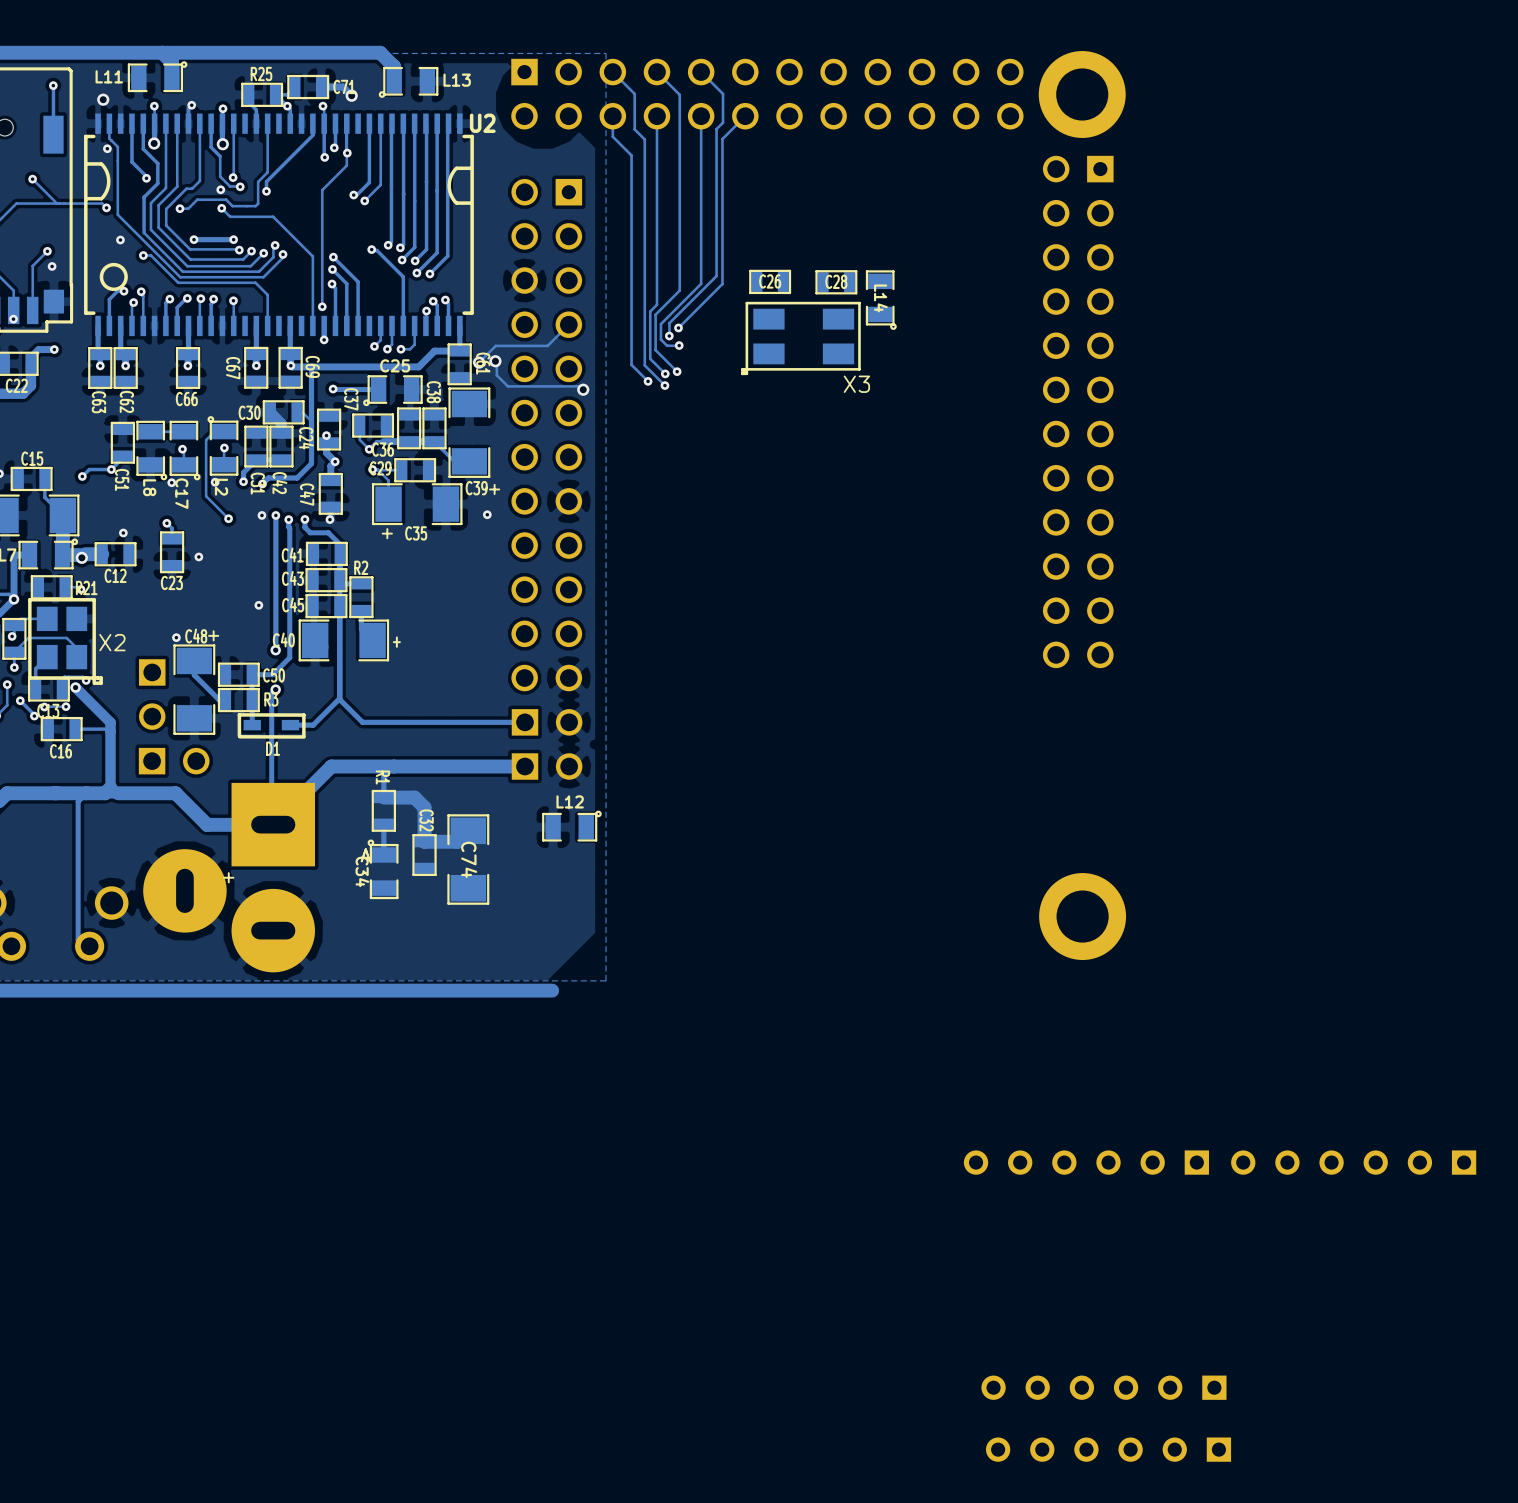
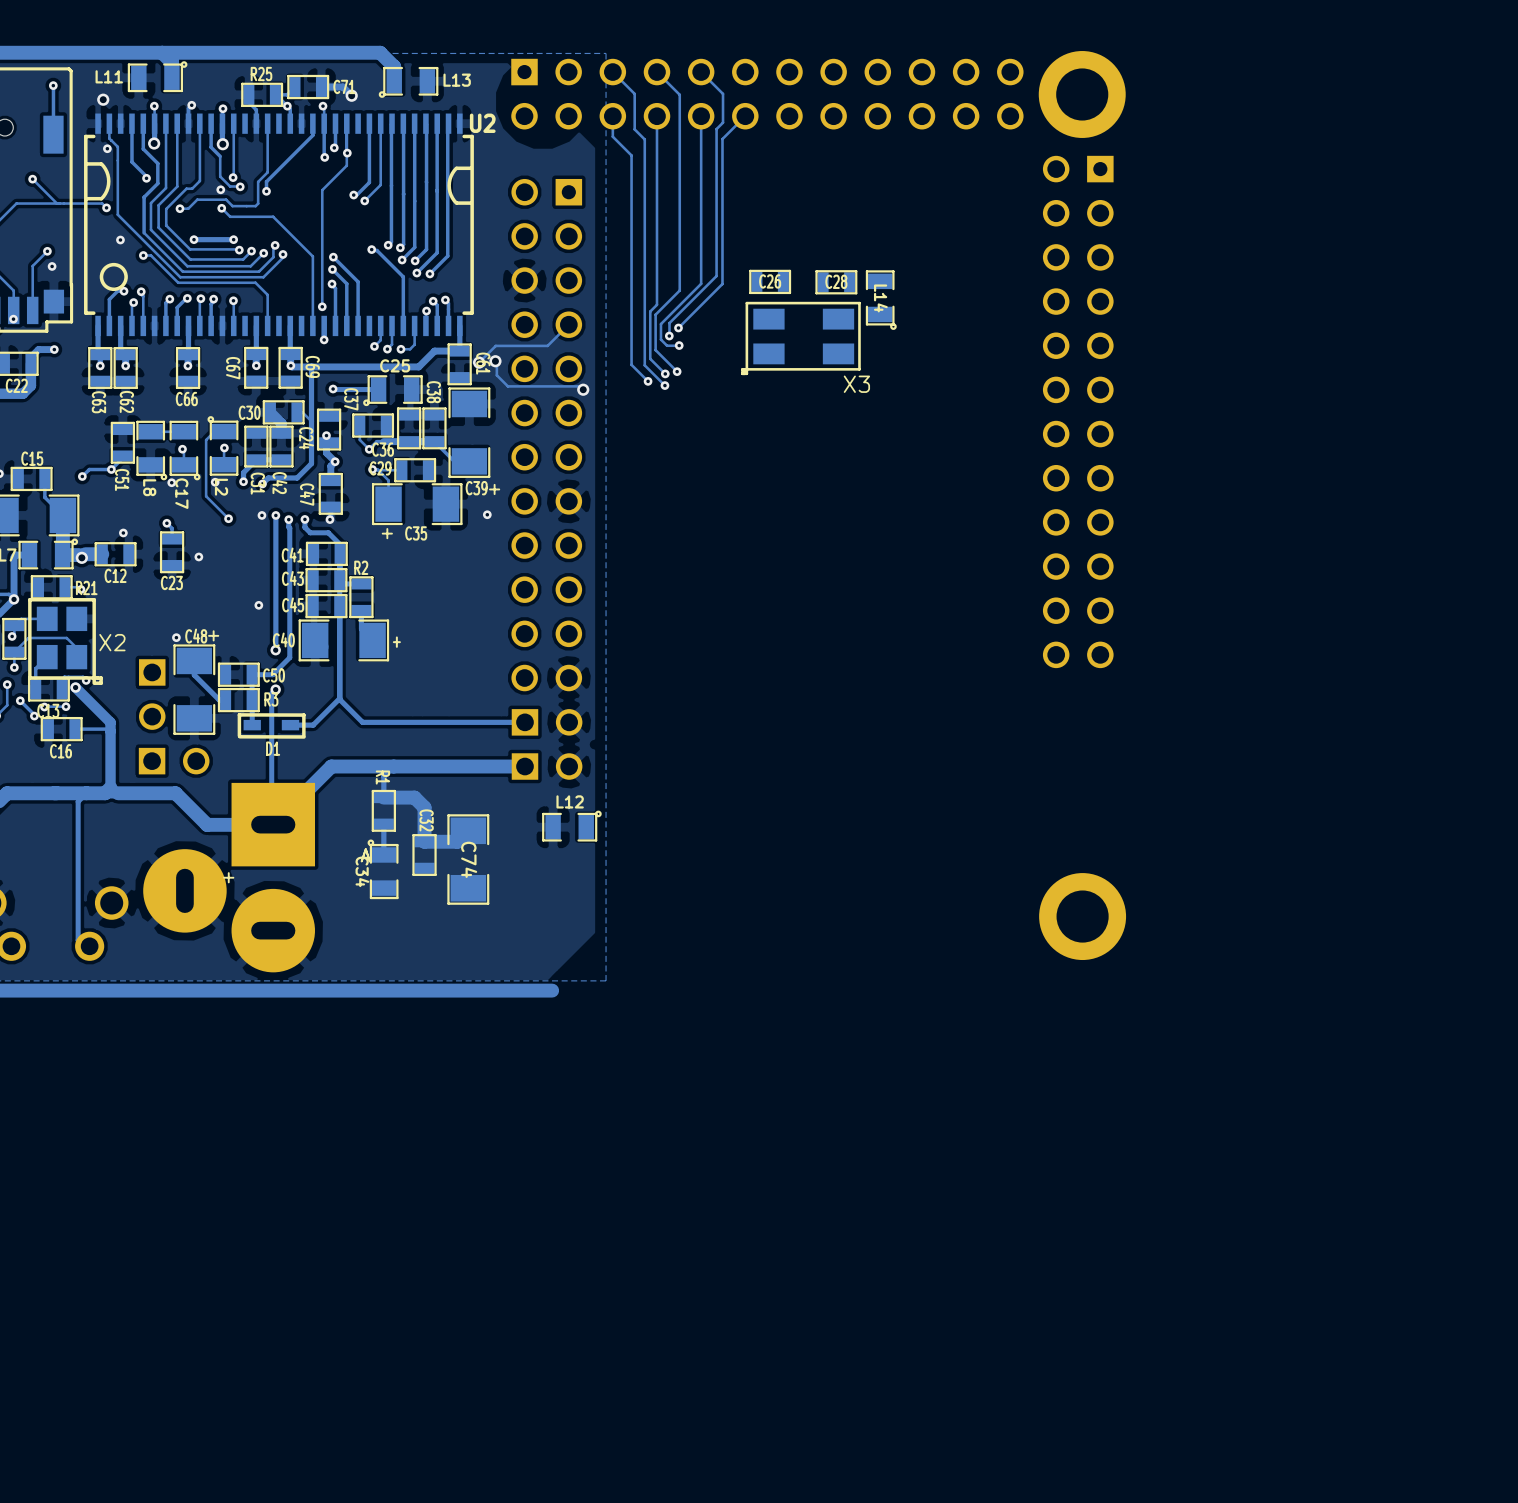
part: (1086, 1162) -> none
part: (1353, 1162) -> none
part: (1103, 1387) -> none
part: (1108, 1449) -> none

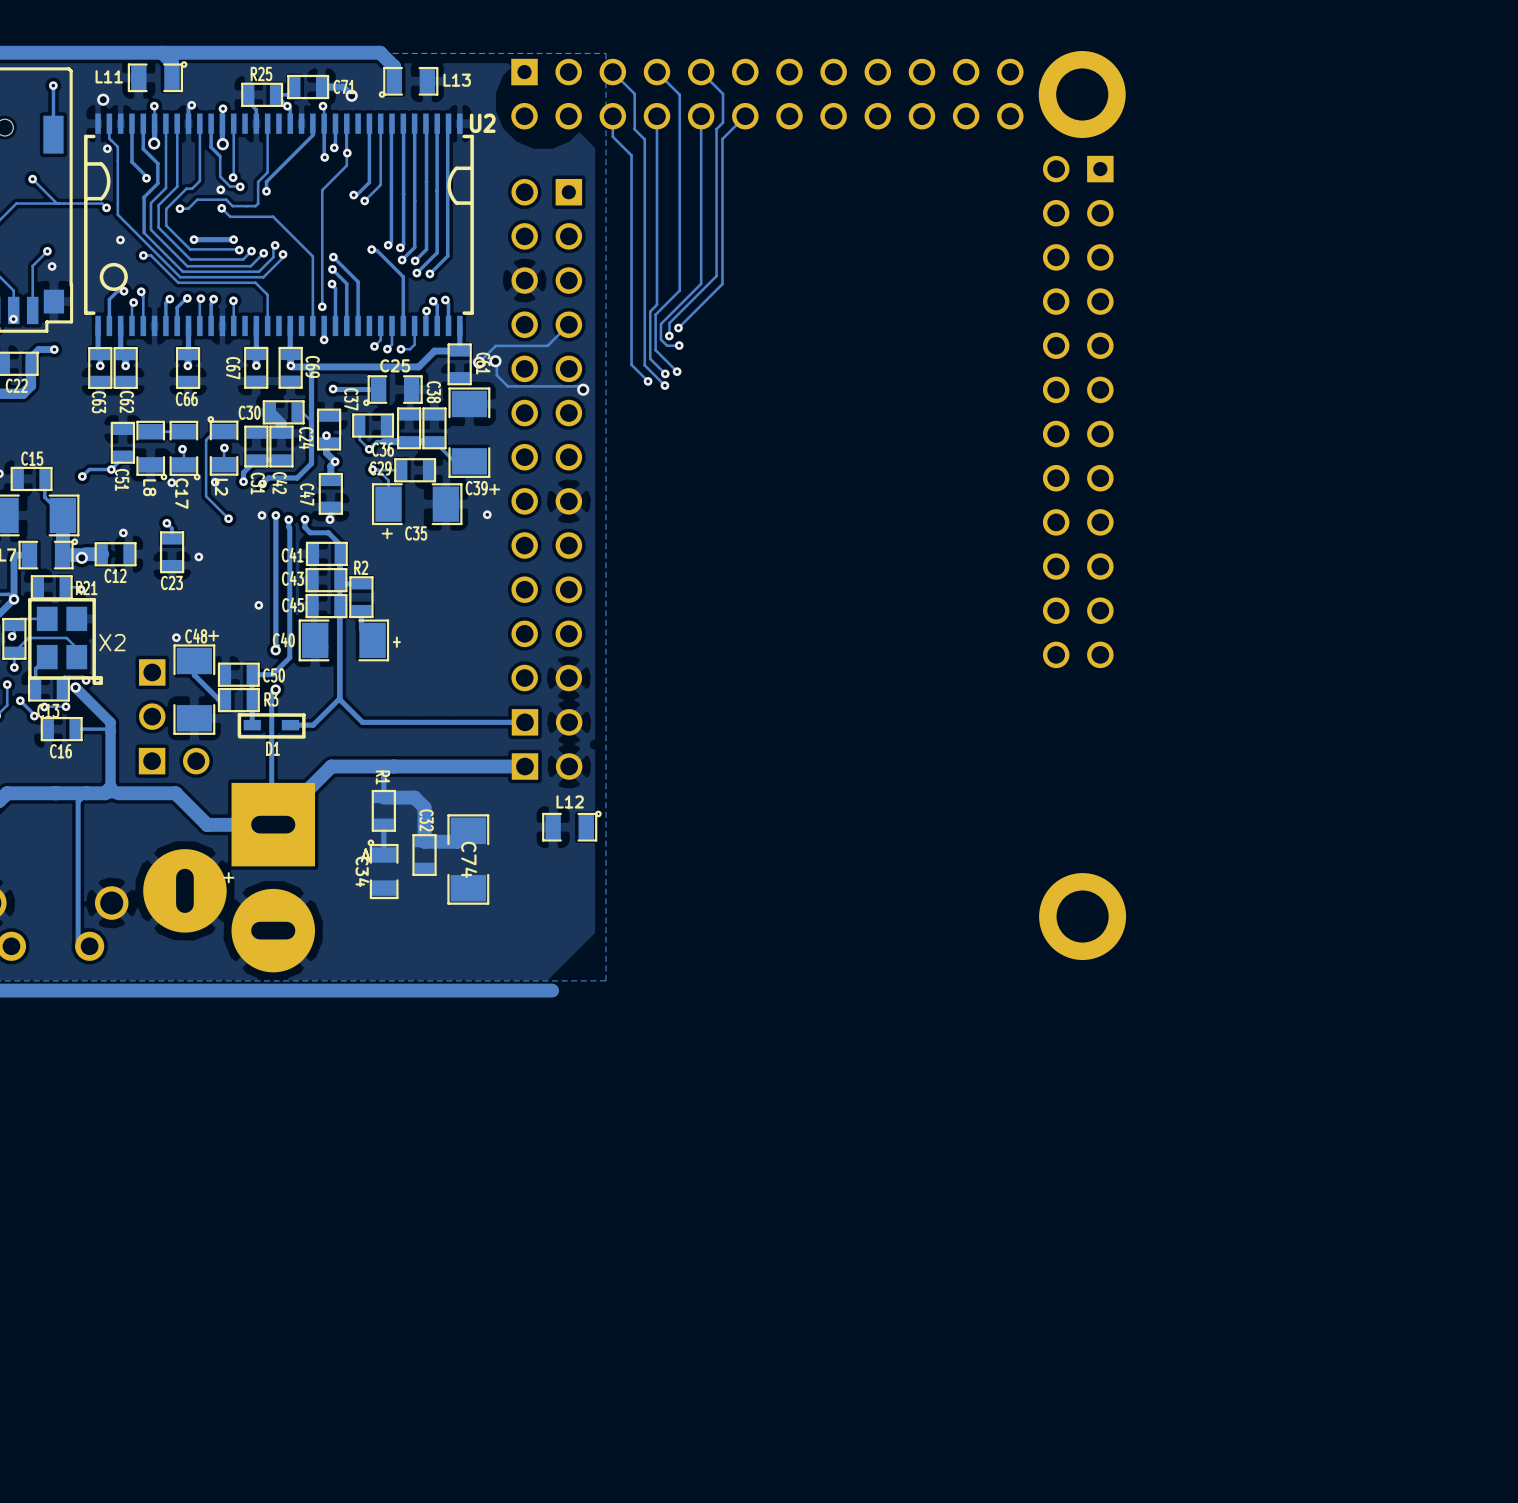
C26: (770, 281) -> none
C28: (836, 282) -> none
L14: (881, 300) -> none
X3: (800, 338) -> none

